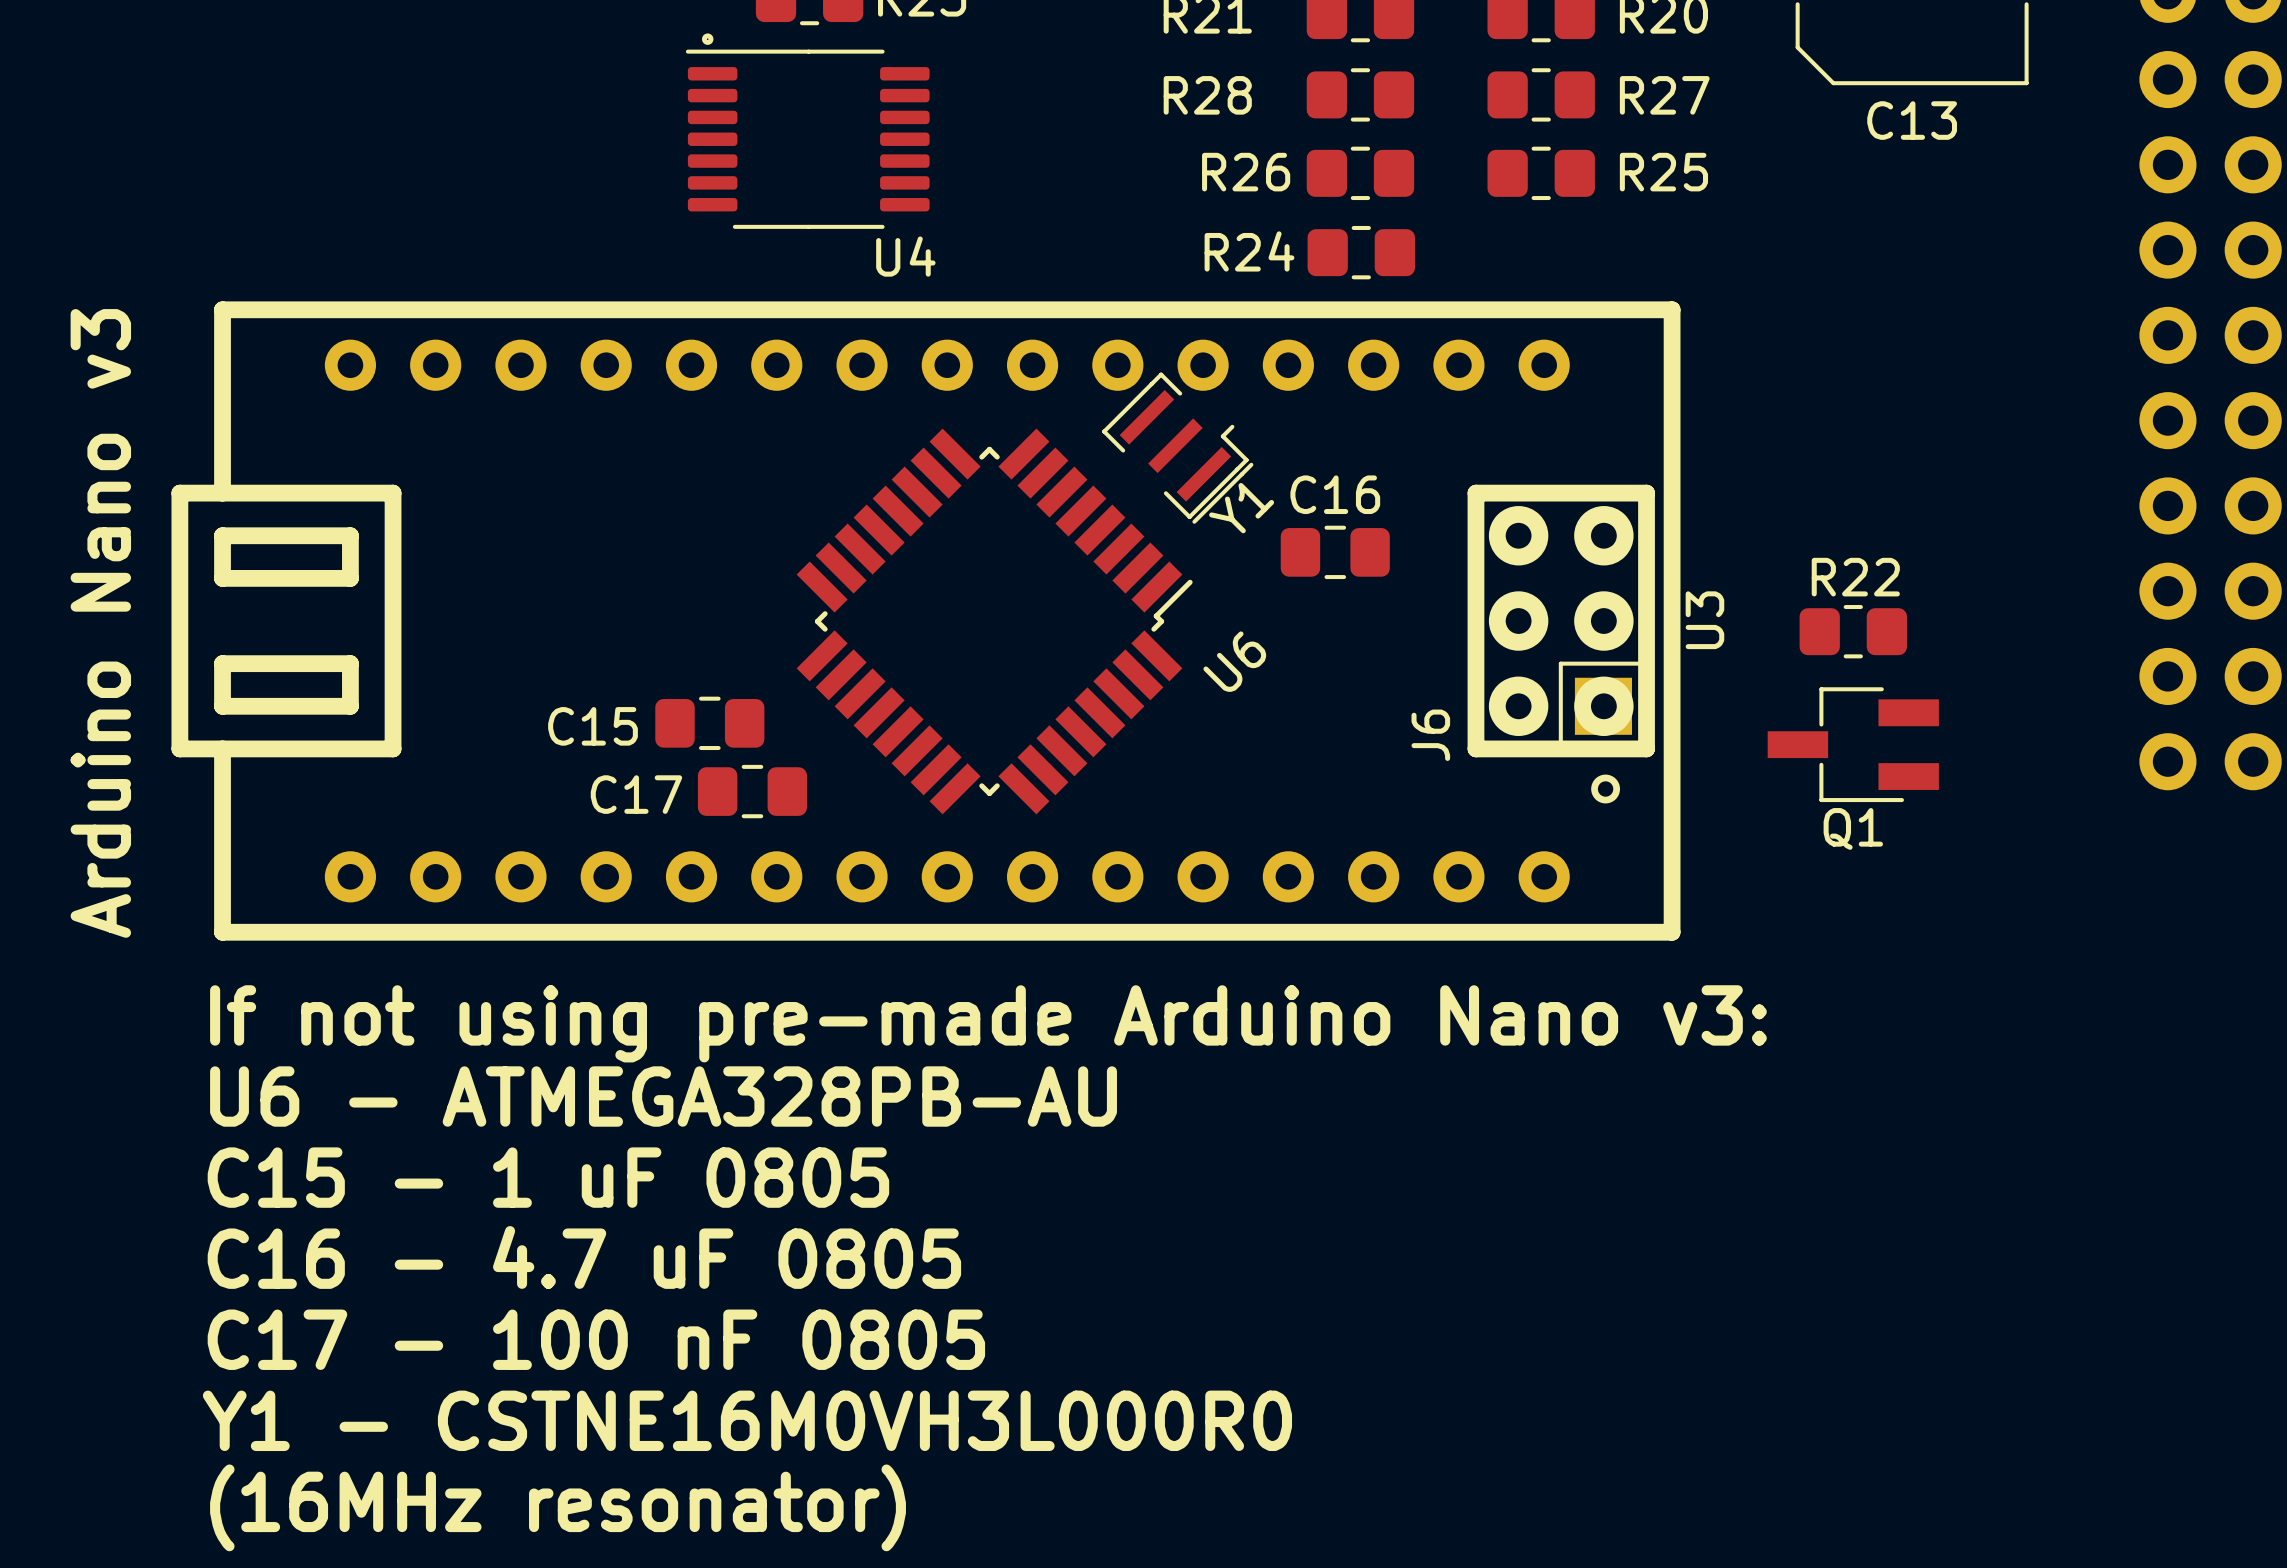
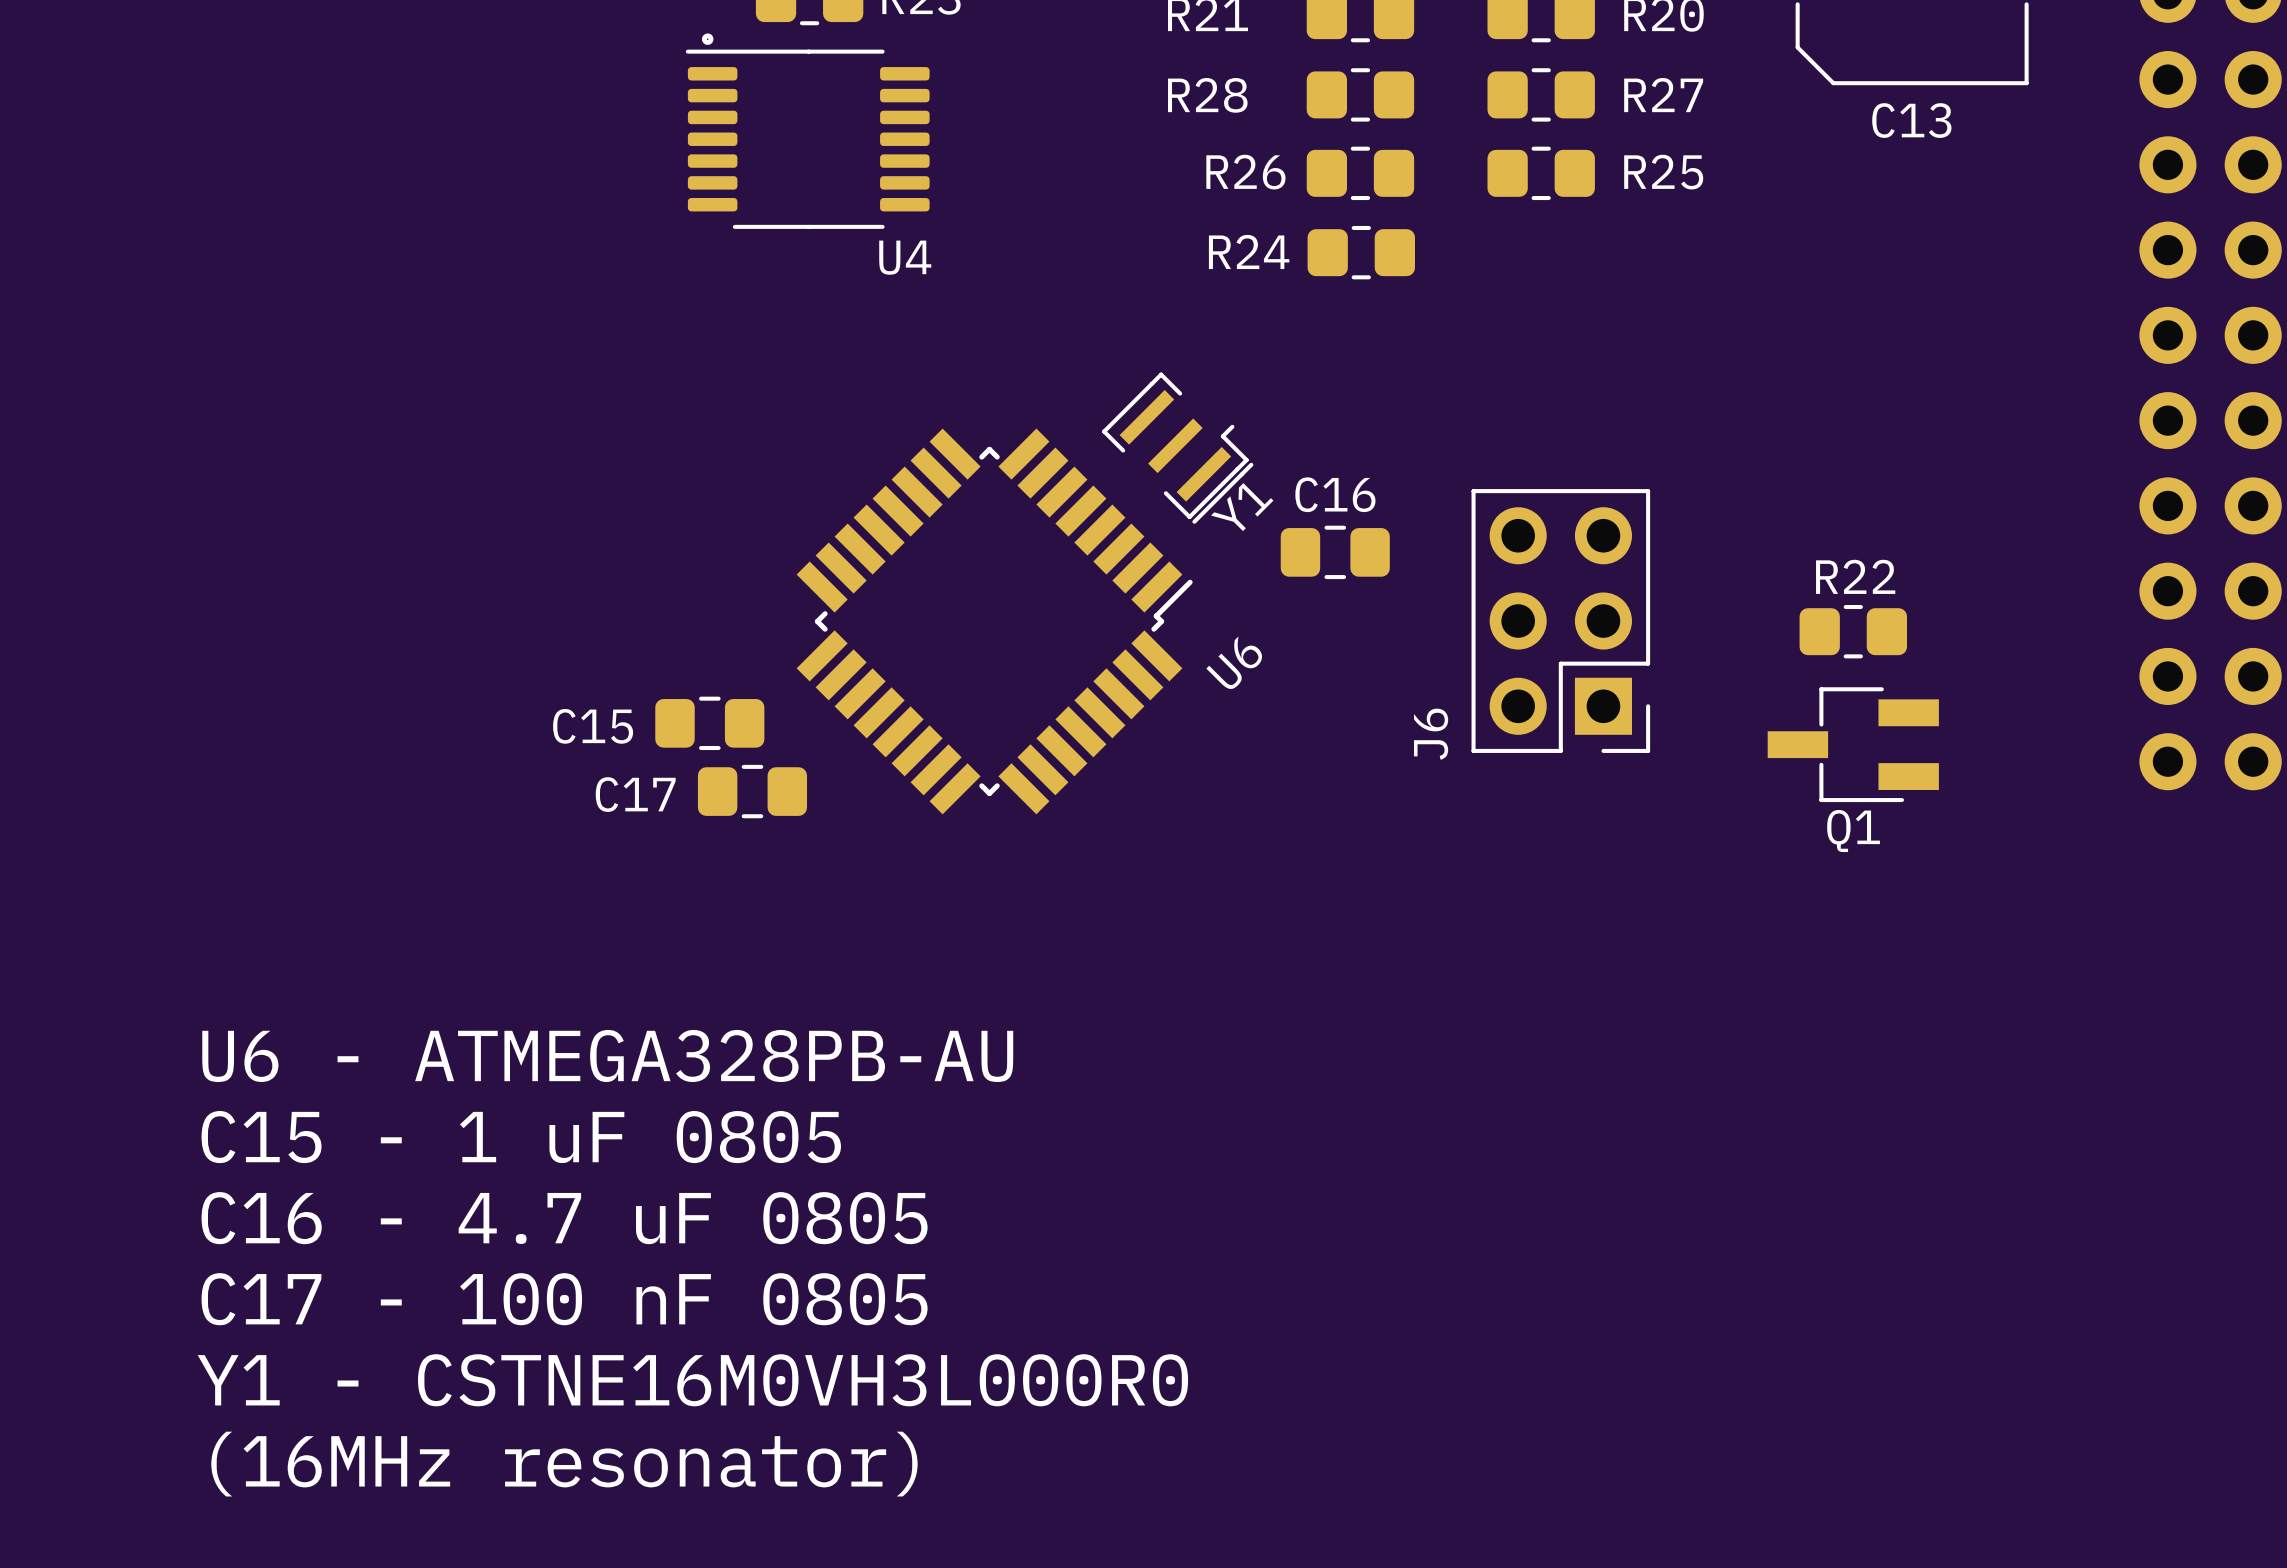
U3: (925, 621) -> none
drawing: [1591, 774, 1621, 804] -> none
text: If not using pre-made Arduino Nano v3: (988, 1023) -> none
text position: U6 - ATMEGA328PB-AU (663, 1096) -> U6 - ATMEGA328PB-AU (607, 1055)
text position: C15 - 1 uF 0805 (548, 1177) -> C15 - 1 uF 0805 (521, 1137)
text position: C16 - 4.7 uF 0805 (584, 1257) -> C16 - 4.7 uF 0805 (564, 1218)
text position: C17 - 100 nF 0805 (596, 1339) -> C17 - 100 nF 0805 (564, 1299)
text position: Y1 - CSTNE16M0VH3L000R0 (747, 1420) -> Y1 - CSTNE16M0VH3L000R0 (692, 1380)
text position: (16MHz resonator) (558, 1507) -> (16MHz resonator) (564, 1464)

